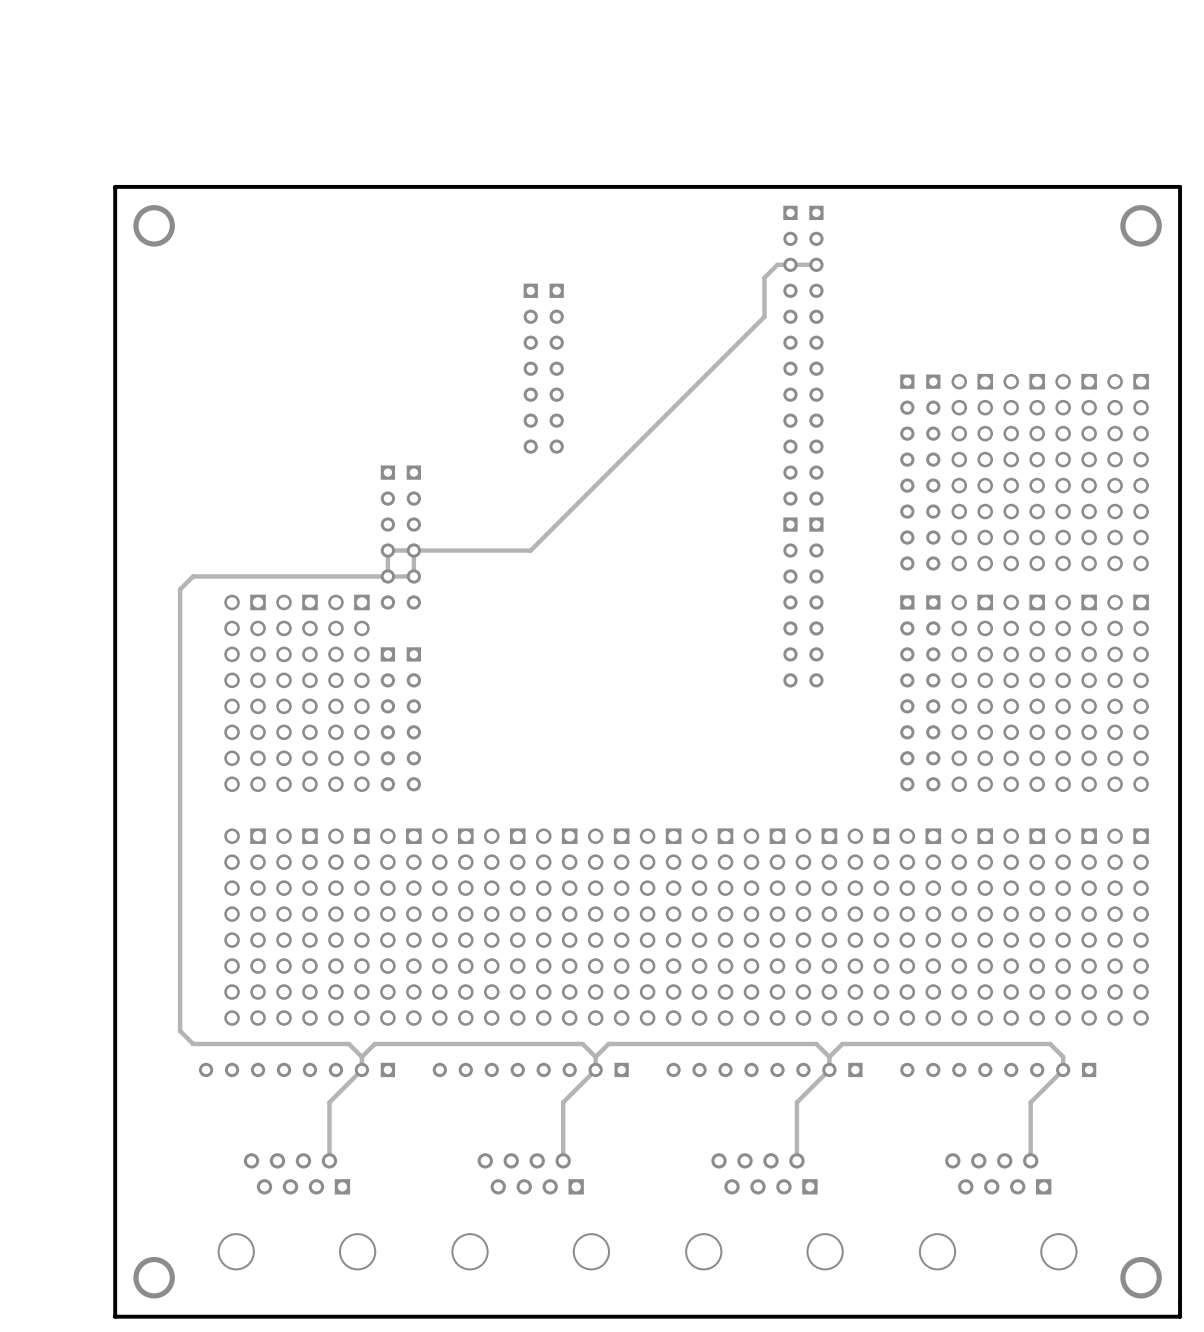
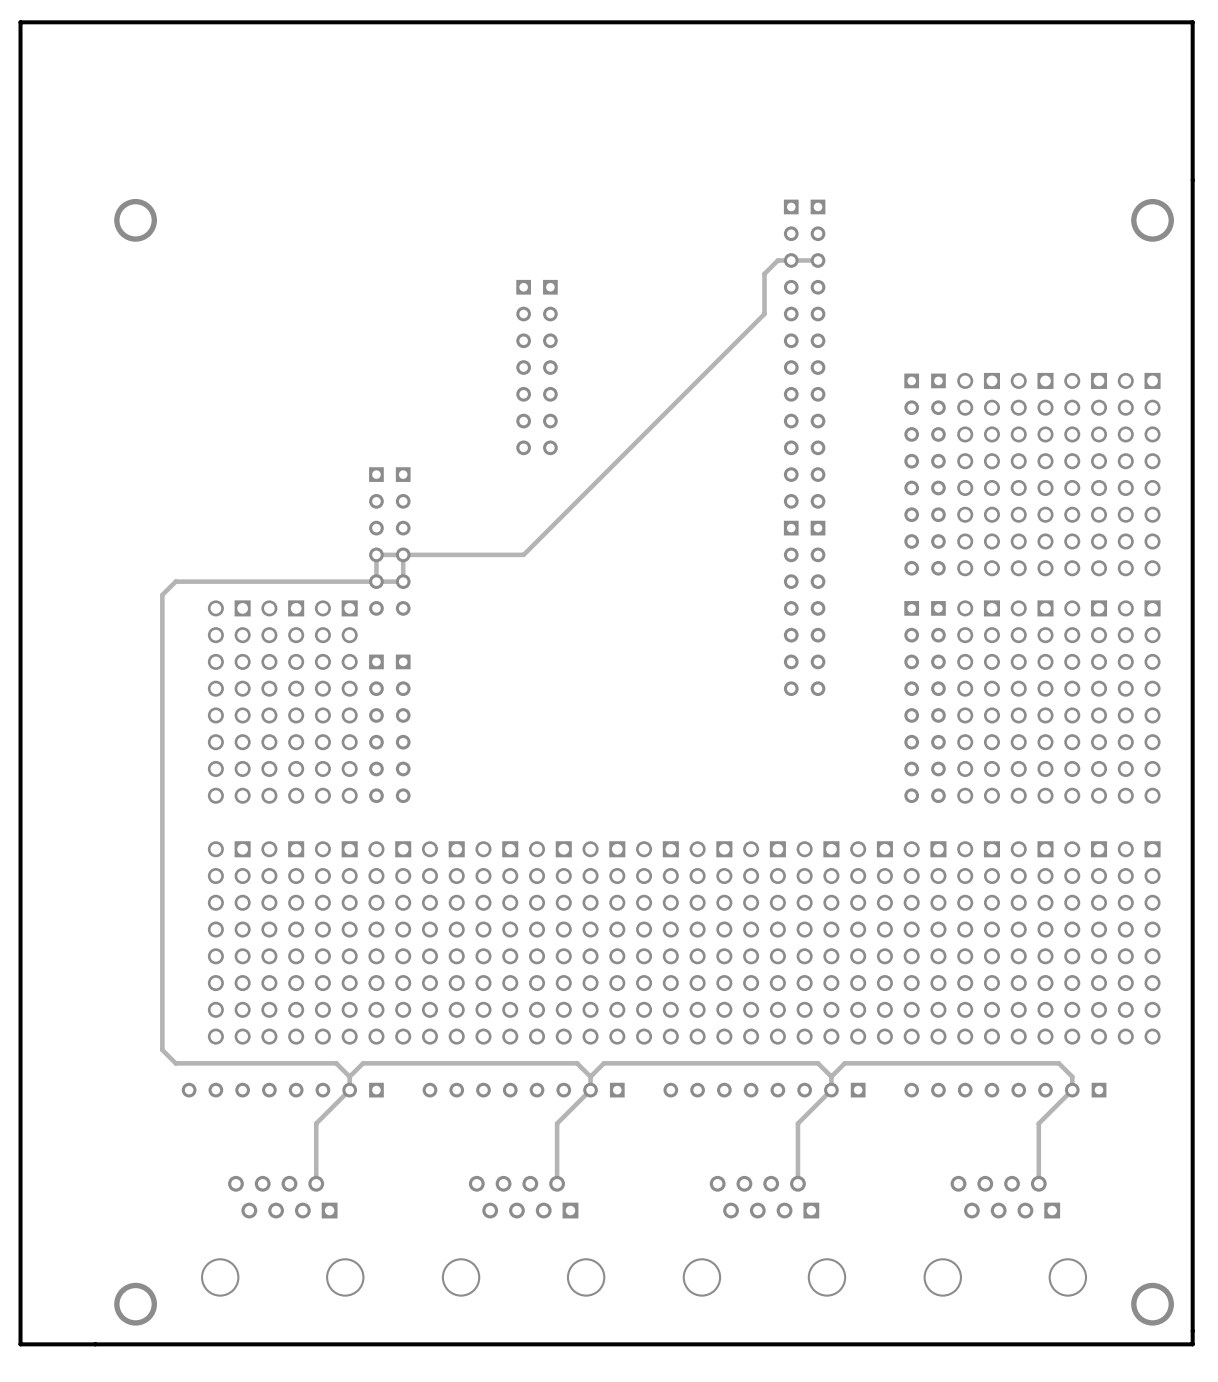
board edge: (1180, 186) (115, 186) (115, 1316) -> (1192, 180) (1192, 22) (20, 22) (20, 1344) (95, 1344)

